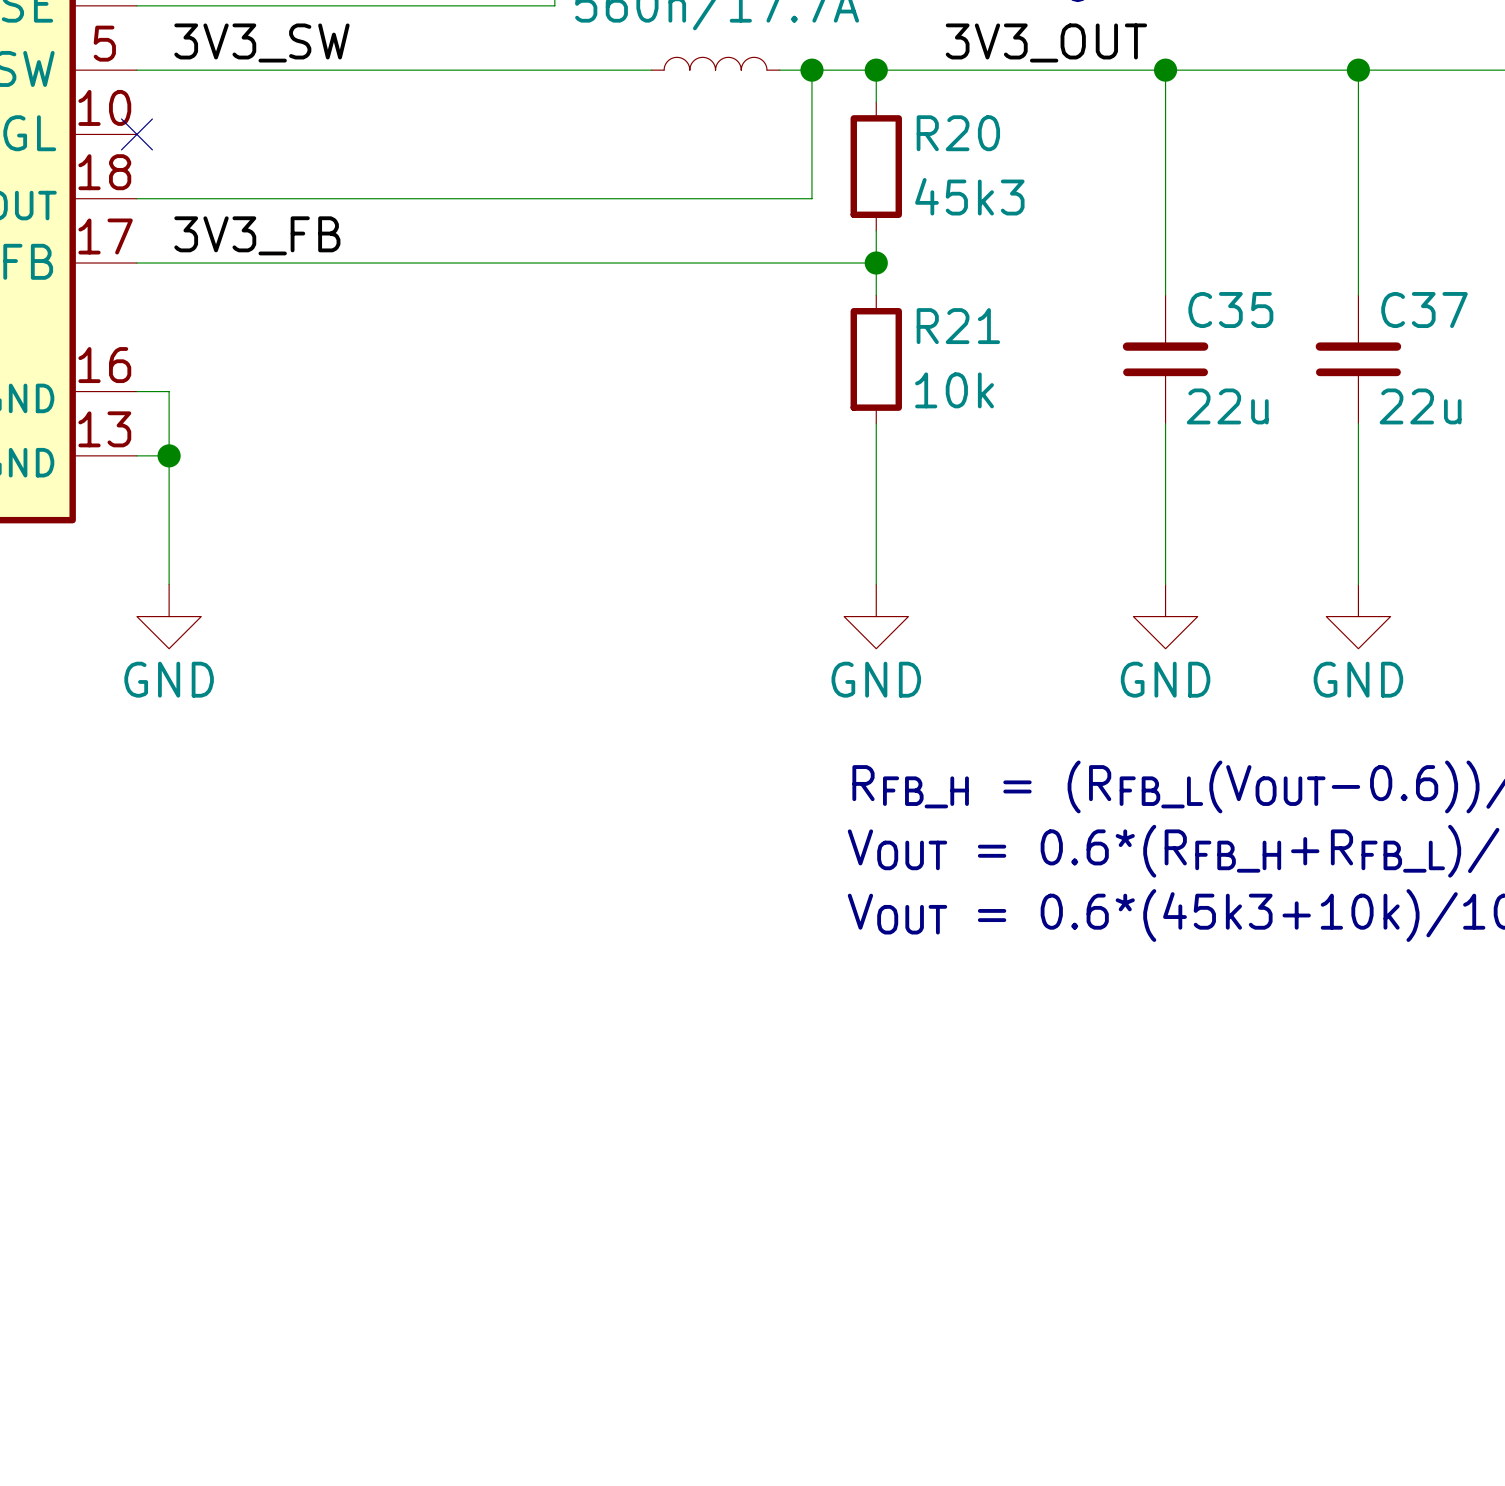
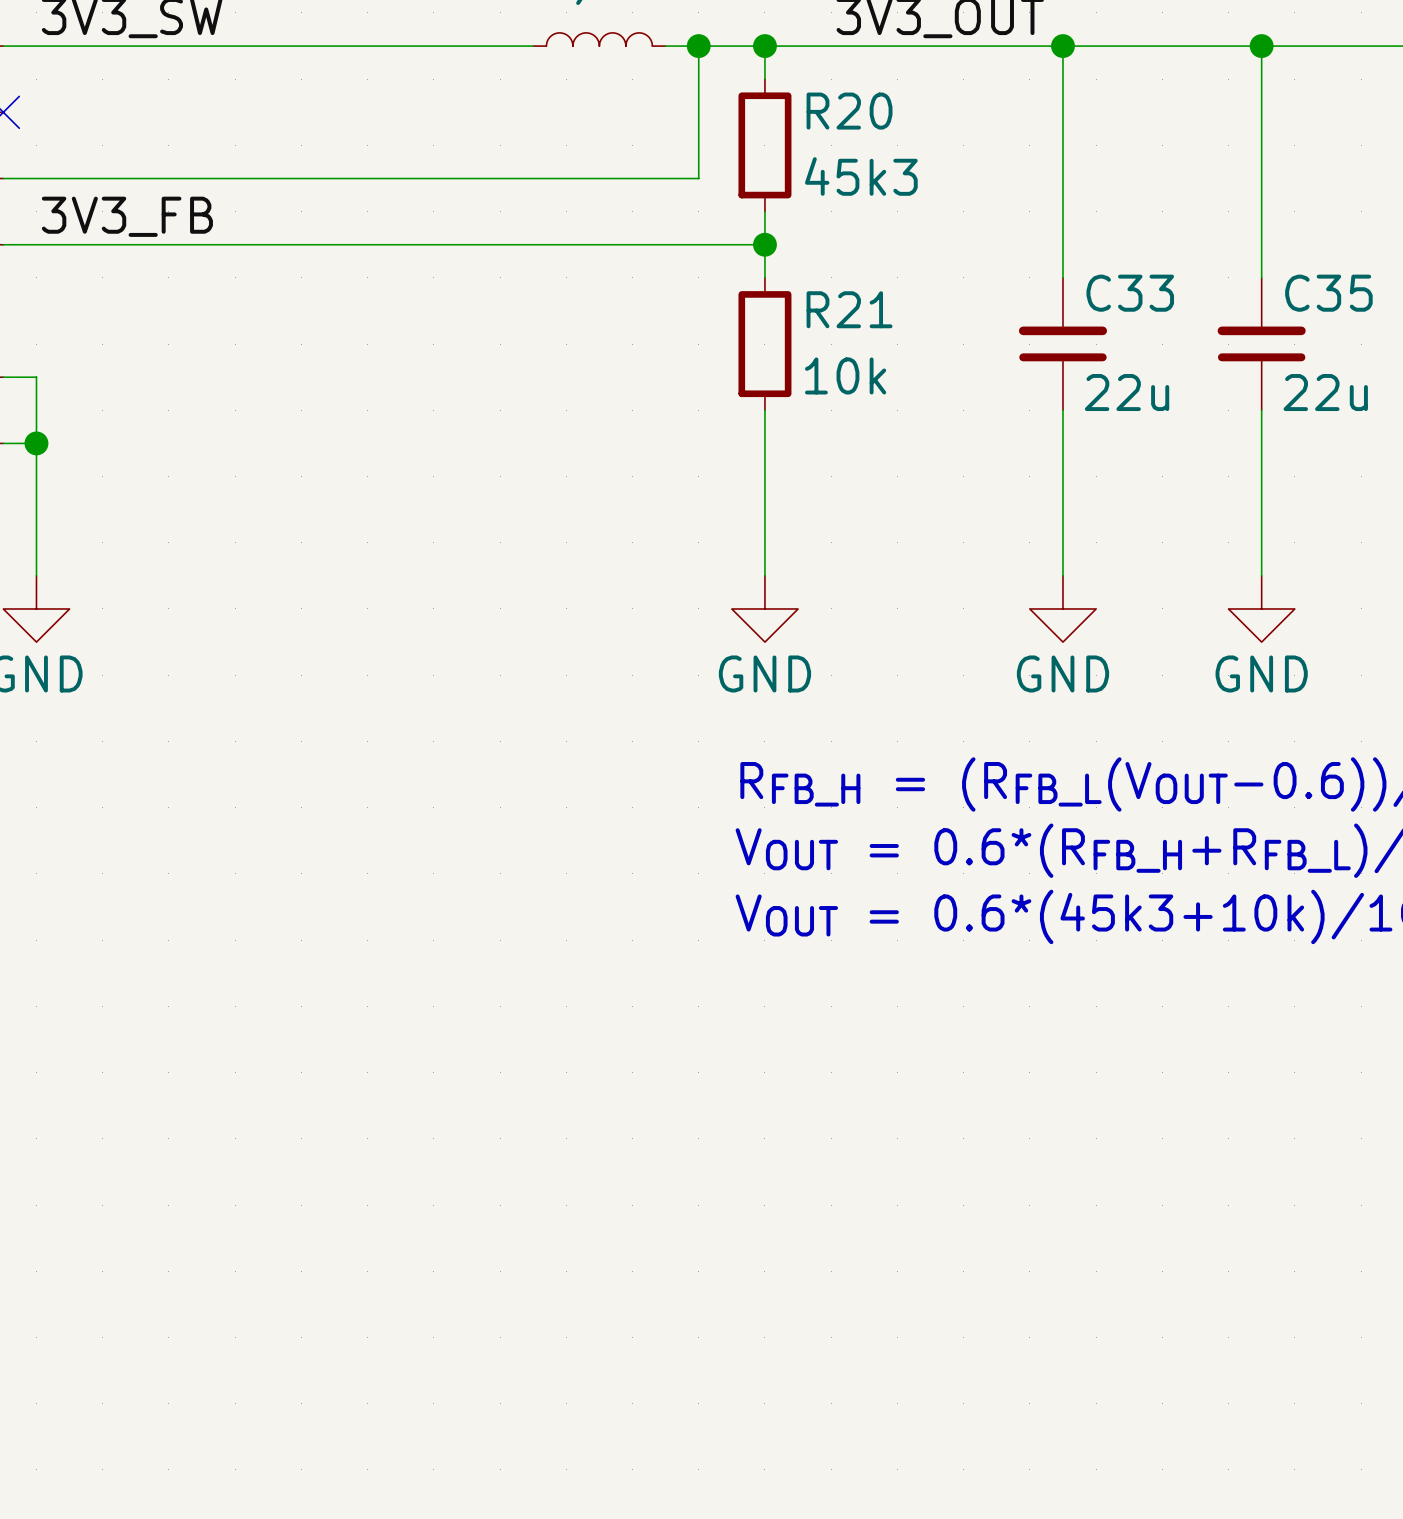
C35 name: C35 (1230, 310) -> C33 (1130, 293)
C37 name: C37 (1424, 310) -> C35 (1328, 293)

